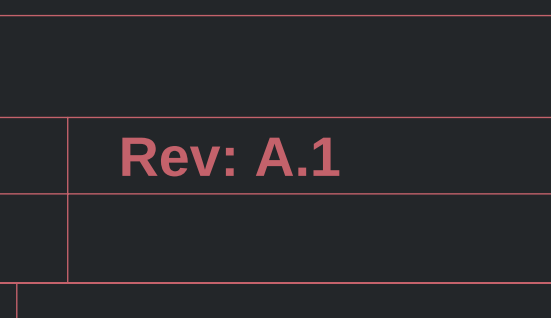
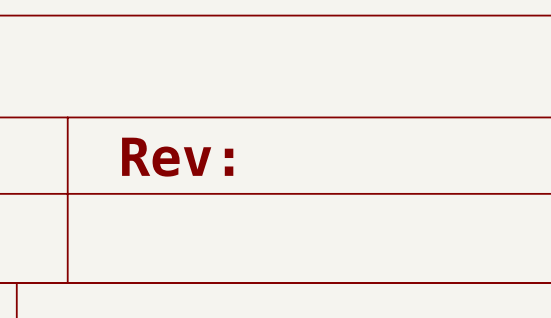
title block: Rev: A.1 (230, 157) -> Rev: (177, 157)

